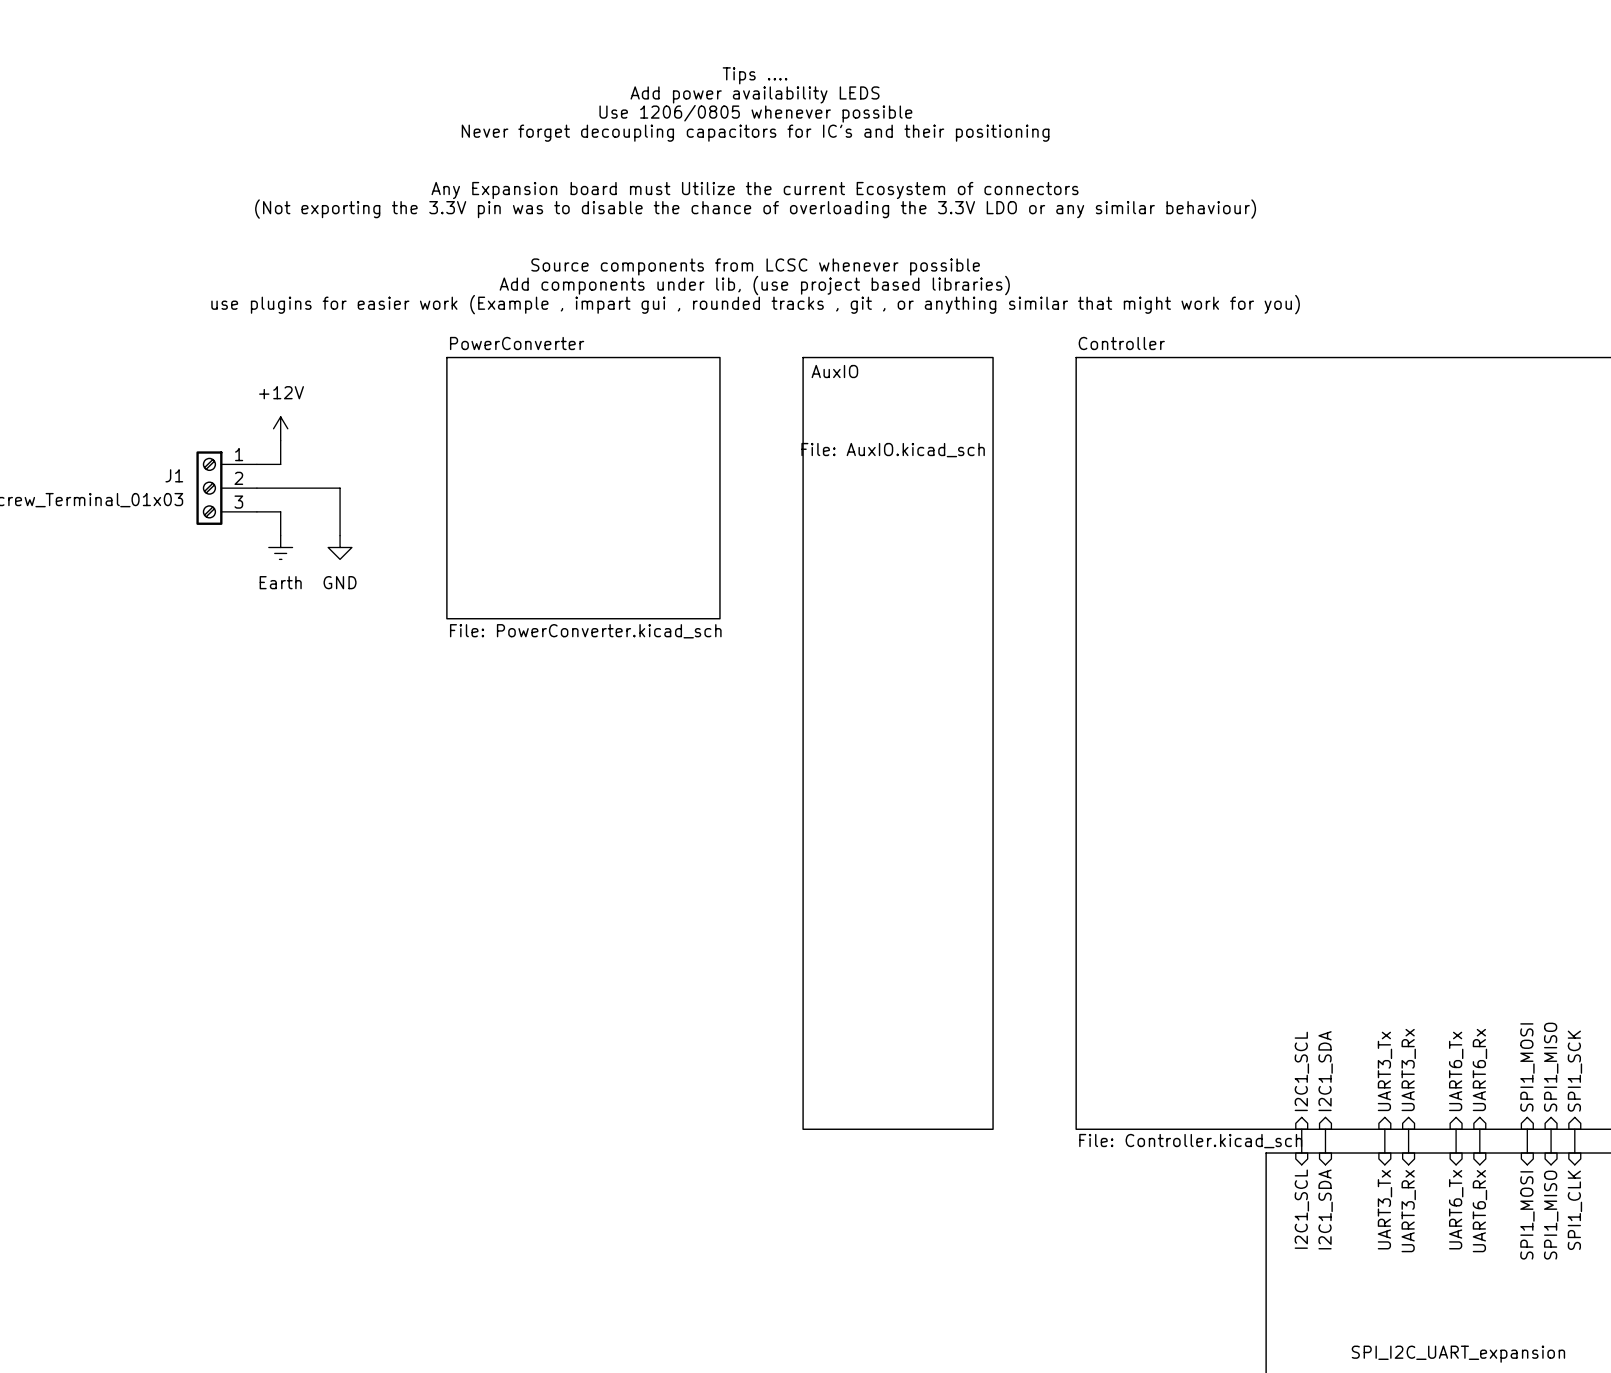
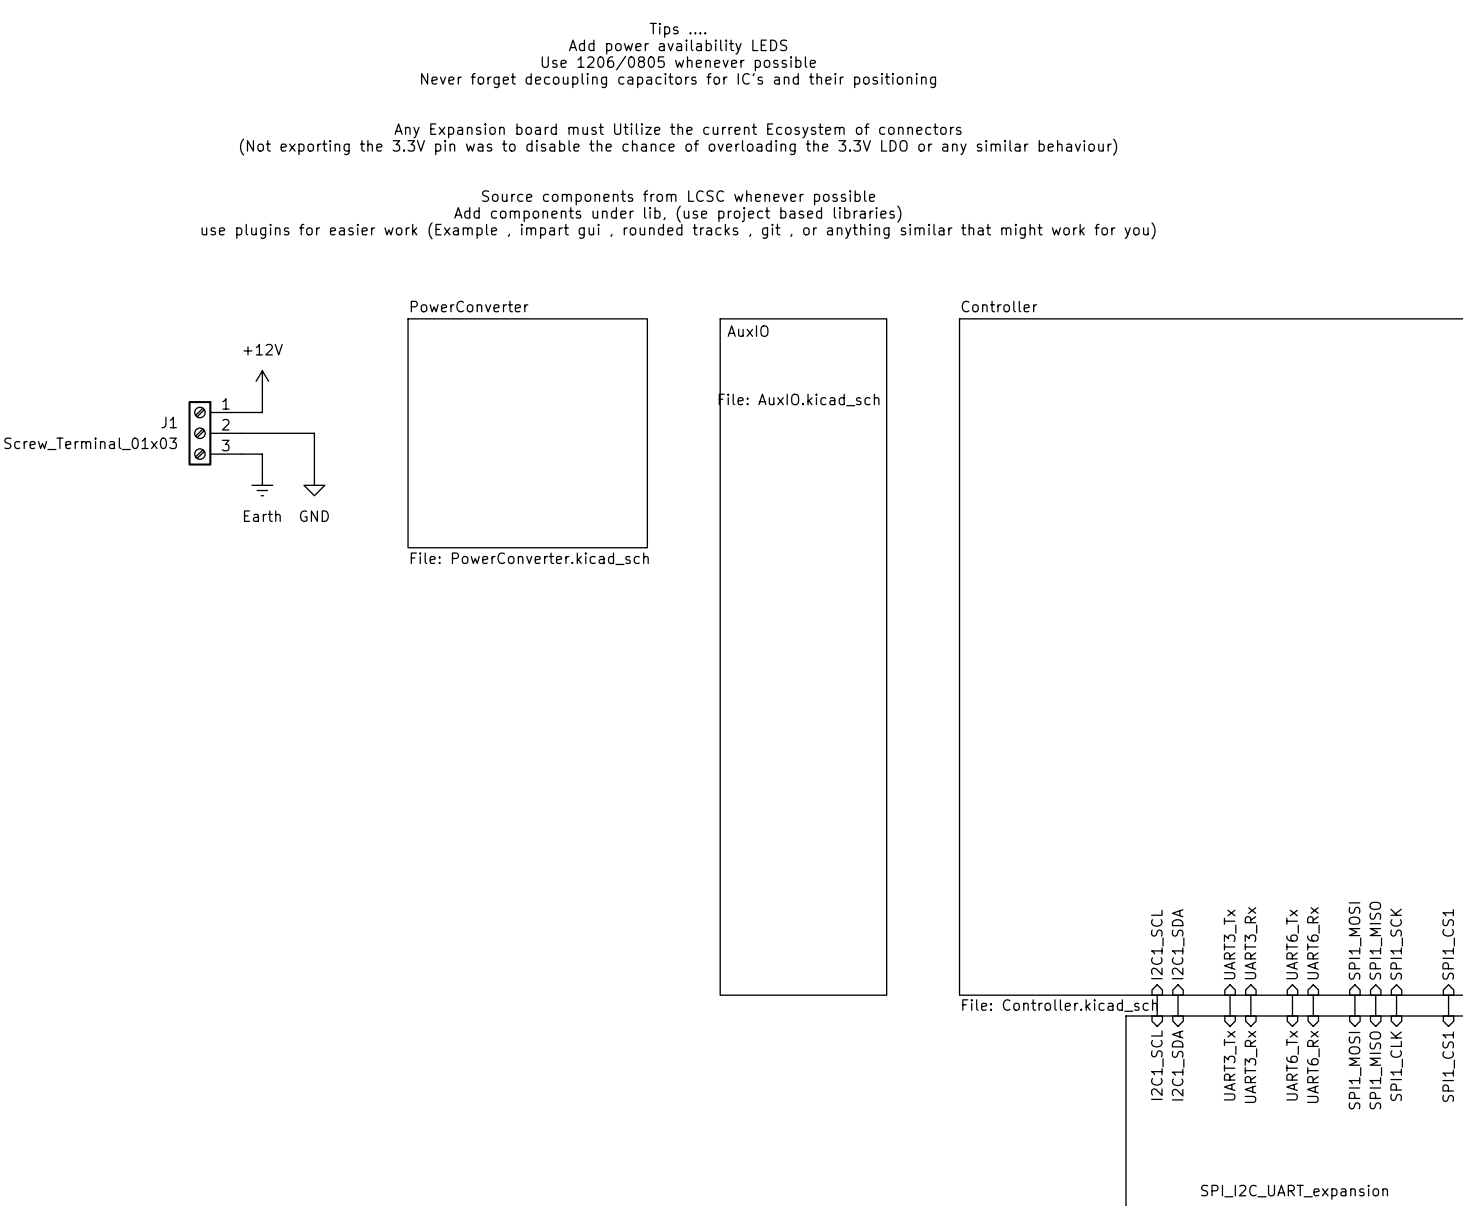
text position: Tips .... (755, 75) -> Tips .... (678, 30)
text position: Add power availability LEDS (755, 94) -> Add power availability LEDS (678, 47)
text position: Use 1206/0805 whenever possible (755, 113) -> Use 1206/0805 whenever possible (678, 63)
text position: Never forget decoupling capacitors for IC's and their positioning (755, 133) -> Never forget decoupling capacitors for IC's and their positioning (678, 80)
text position: Any Expansion board must Utilize the current Ecosystem of connectors (755, 190) -> Any Expansion board must Utilize the current Ecosystem of connectors (678, 130)
text position: (Not exporting the 3.3V pin was to disable the chance of overloading the 3.3V LDO or any similar behaviour) (755, 209) -> (Not exporting the 3.3V pin was to disable the chance of overloading the 3.3V LDO or any similar behaviour) (678, 147)
text position: Source components from LCSC whenever possible (755, 266) -> Source components from LCSC whenever possible (678, 197)
text position: Add components under lib, (use project based libraries) (754, 285) -> Add components under lib, (use project based libraries) (677, 214)
text position: use plugins for easier work (Example , impart gui , rounded tracks , git , or anything similar that might work for you) (755, 304) -> use plugins for easier work (Example , impart gui , rounded tracks , git , or anything similar that might work for you) (678, 230)

